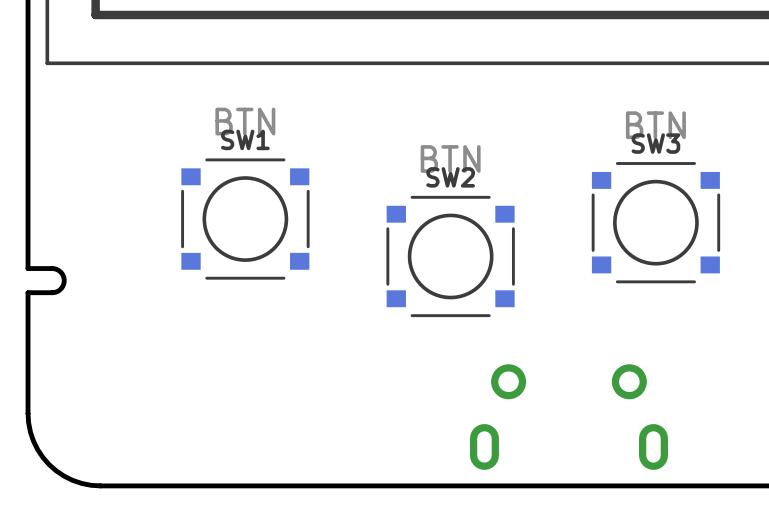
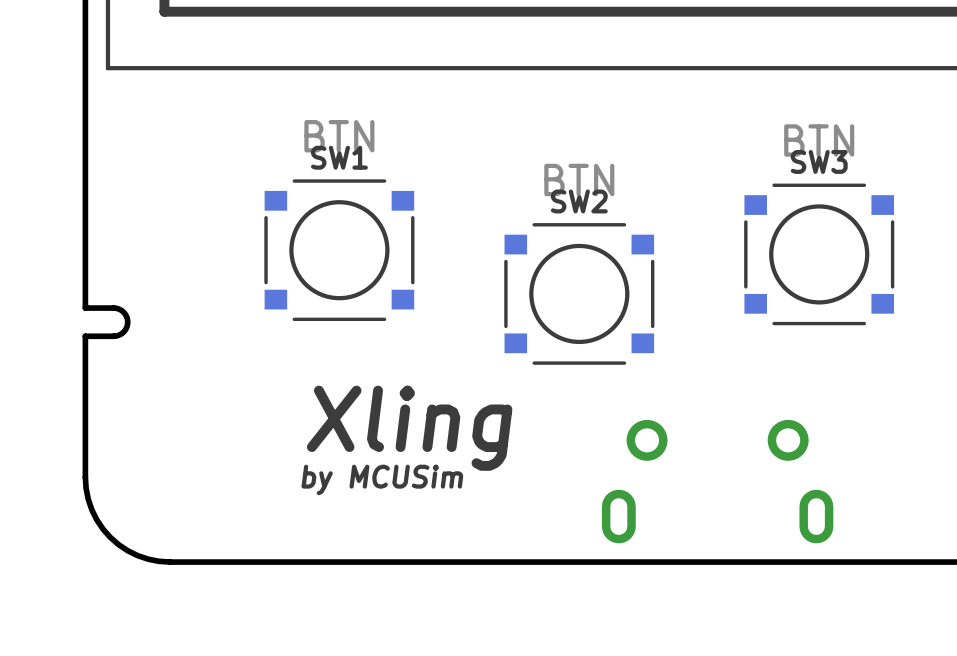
text: none -> Xling (409, 428)
text: none -> by MCUSim (382, 479)

